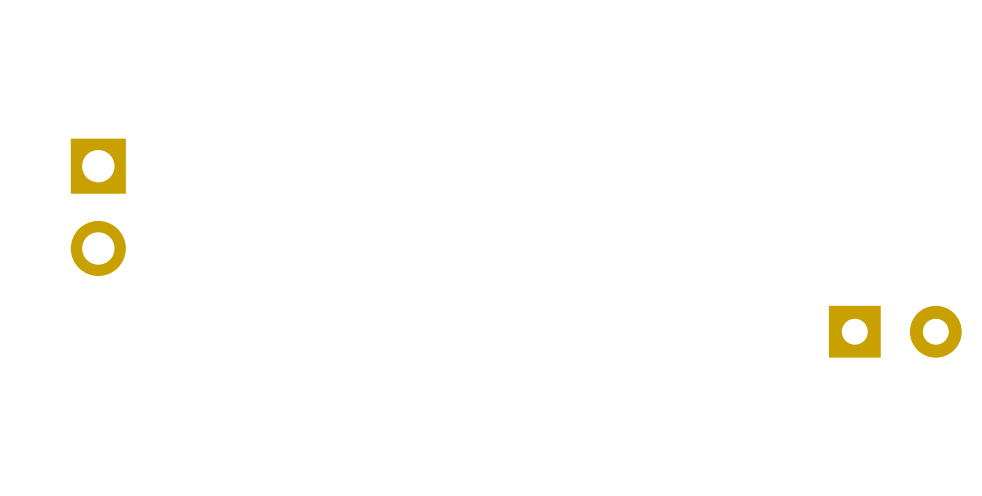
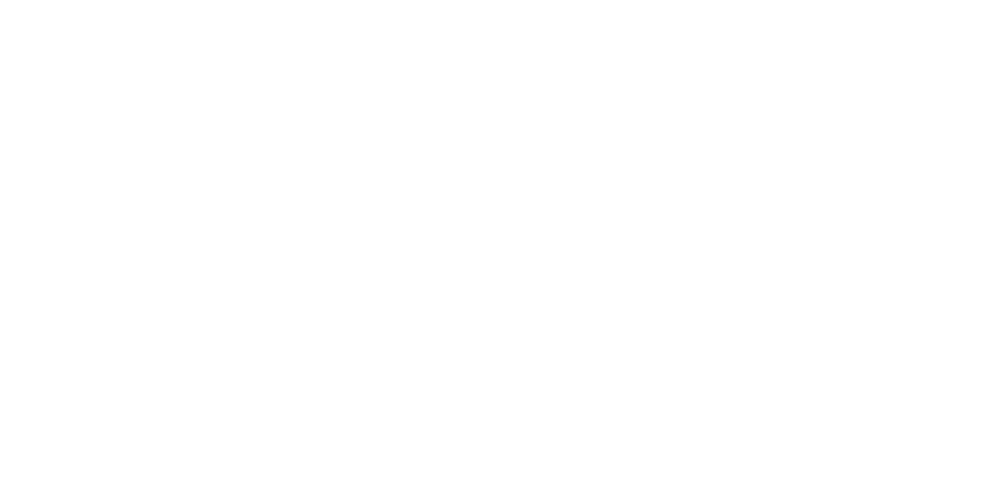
part: (98, 207) -> none
part: (895, 331) -> none

